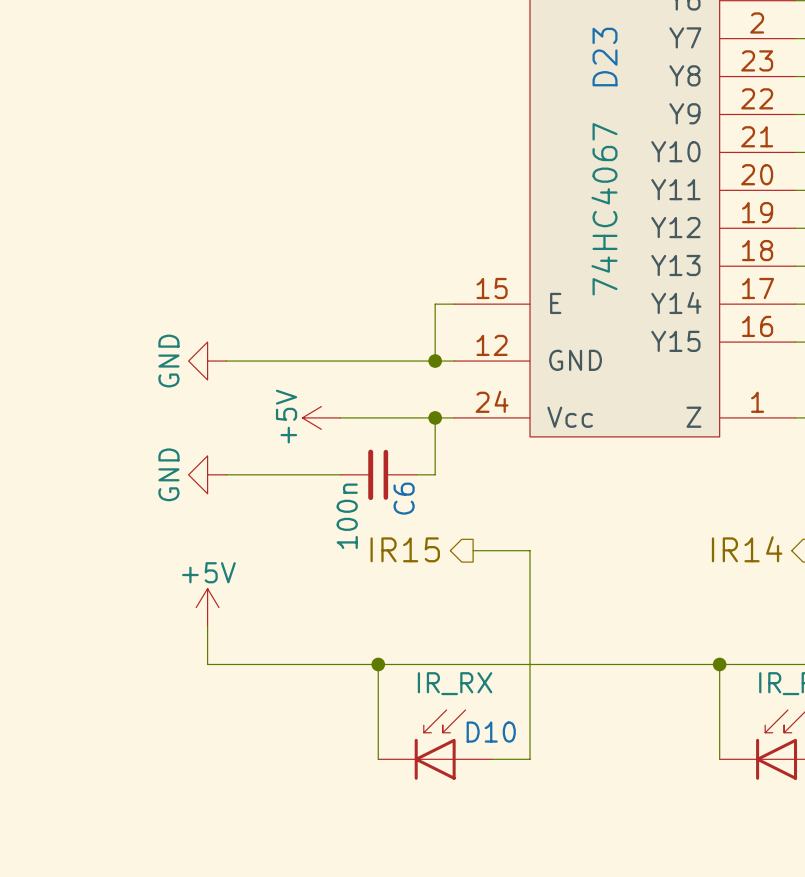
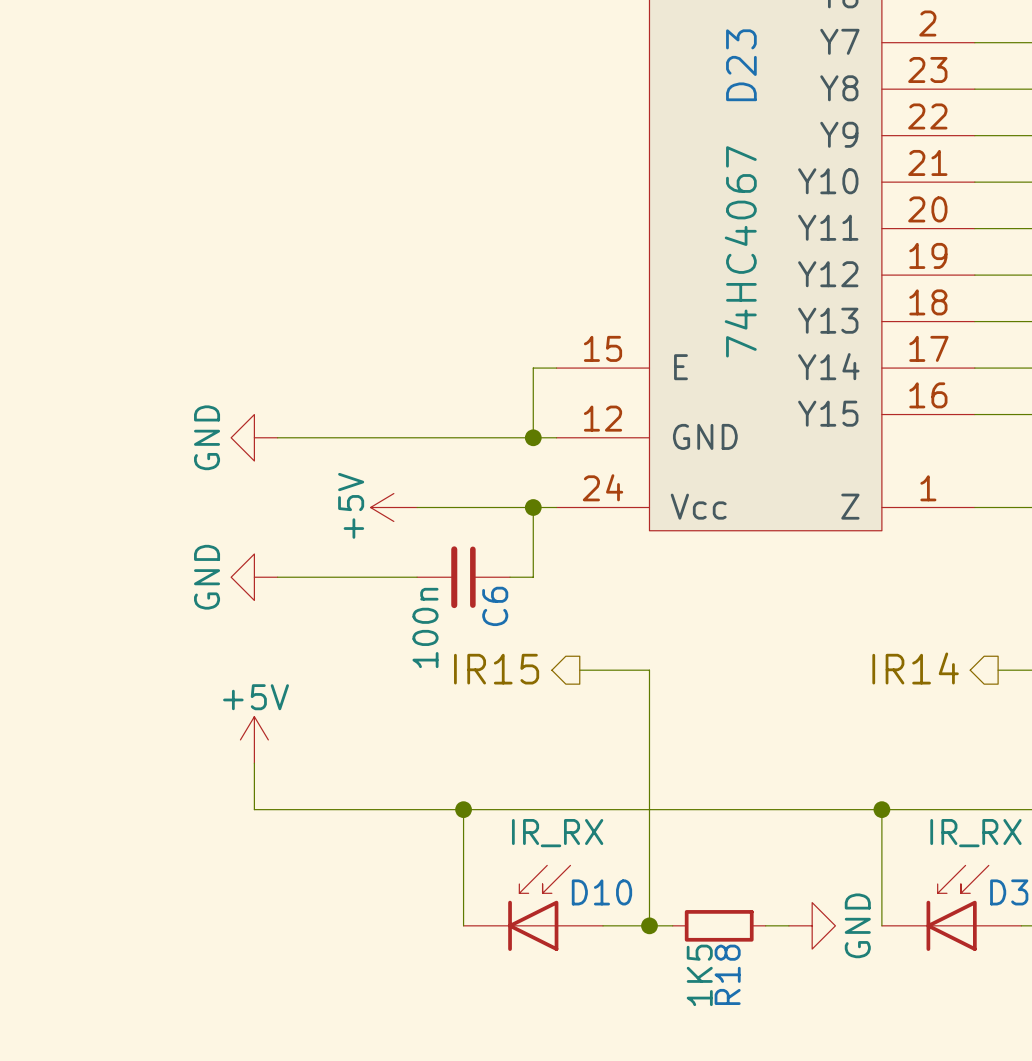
wire: none -> (649, 925) (672, 925)
junction: none -> (649, 925)
R18: none -> 1K5 (719, 925)
wire: none -> (765, 925) (788, 925)
power symbol: none -> GND (812, 925)

